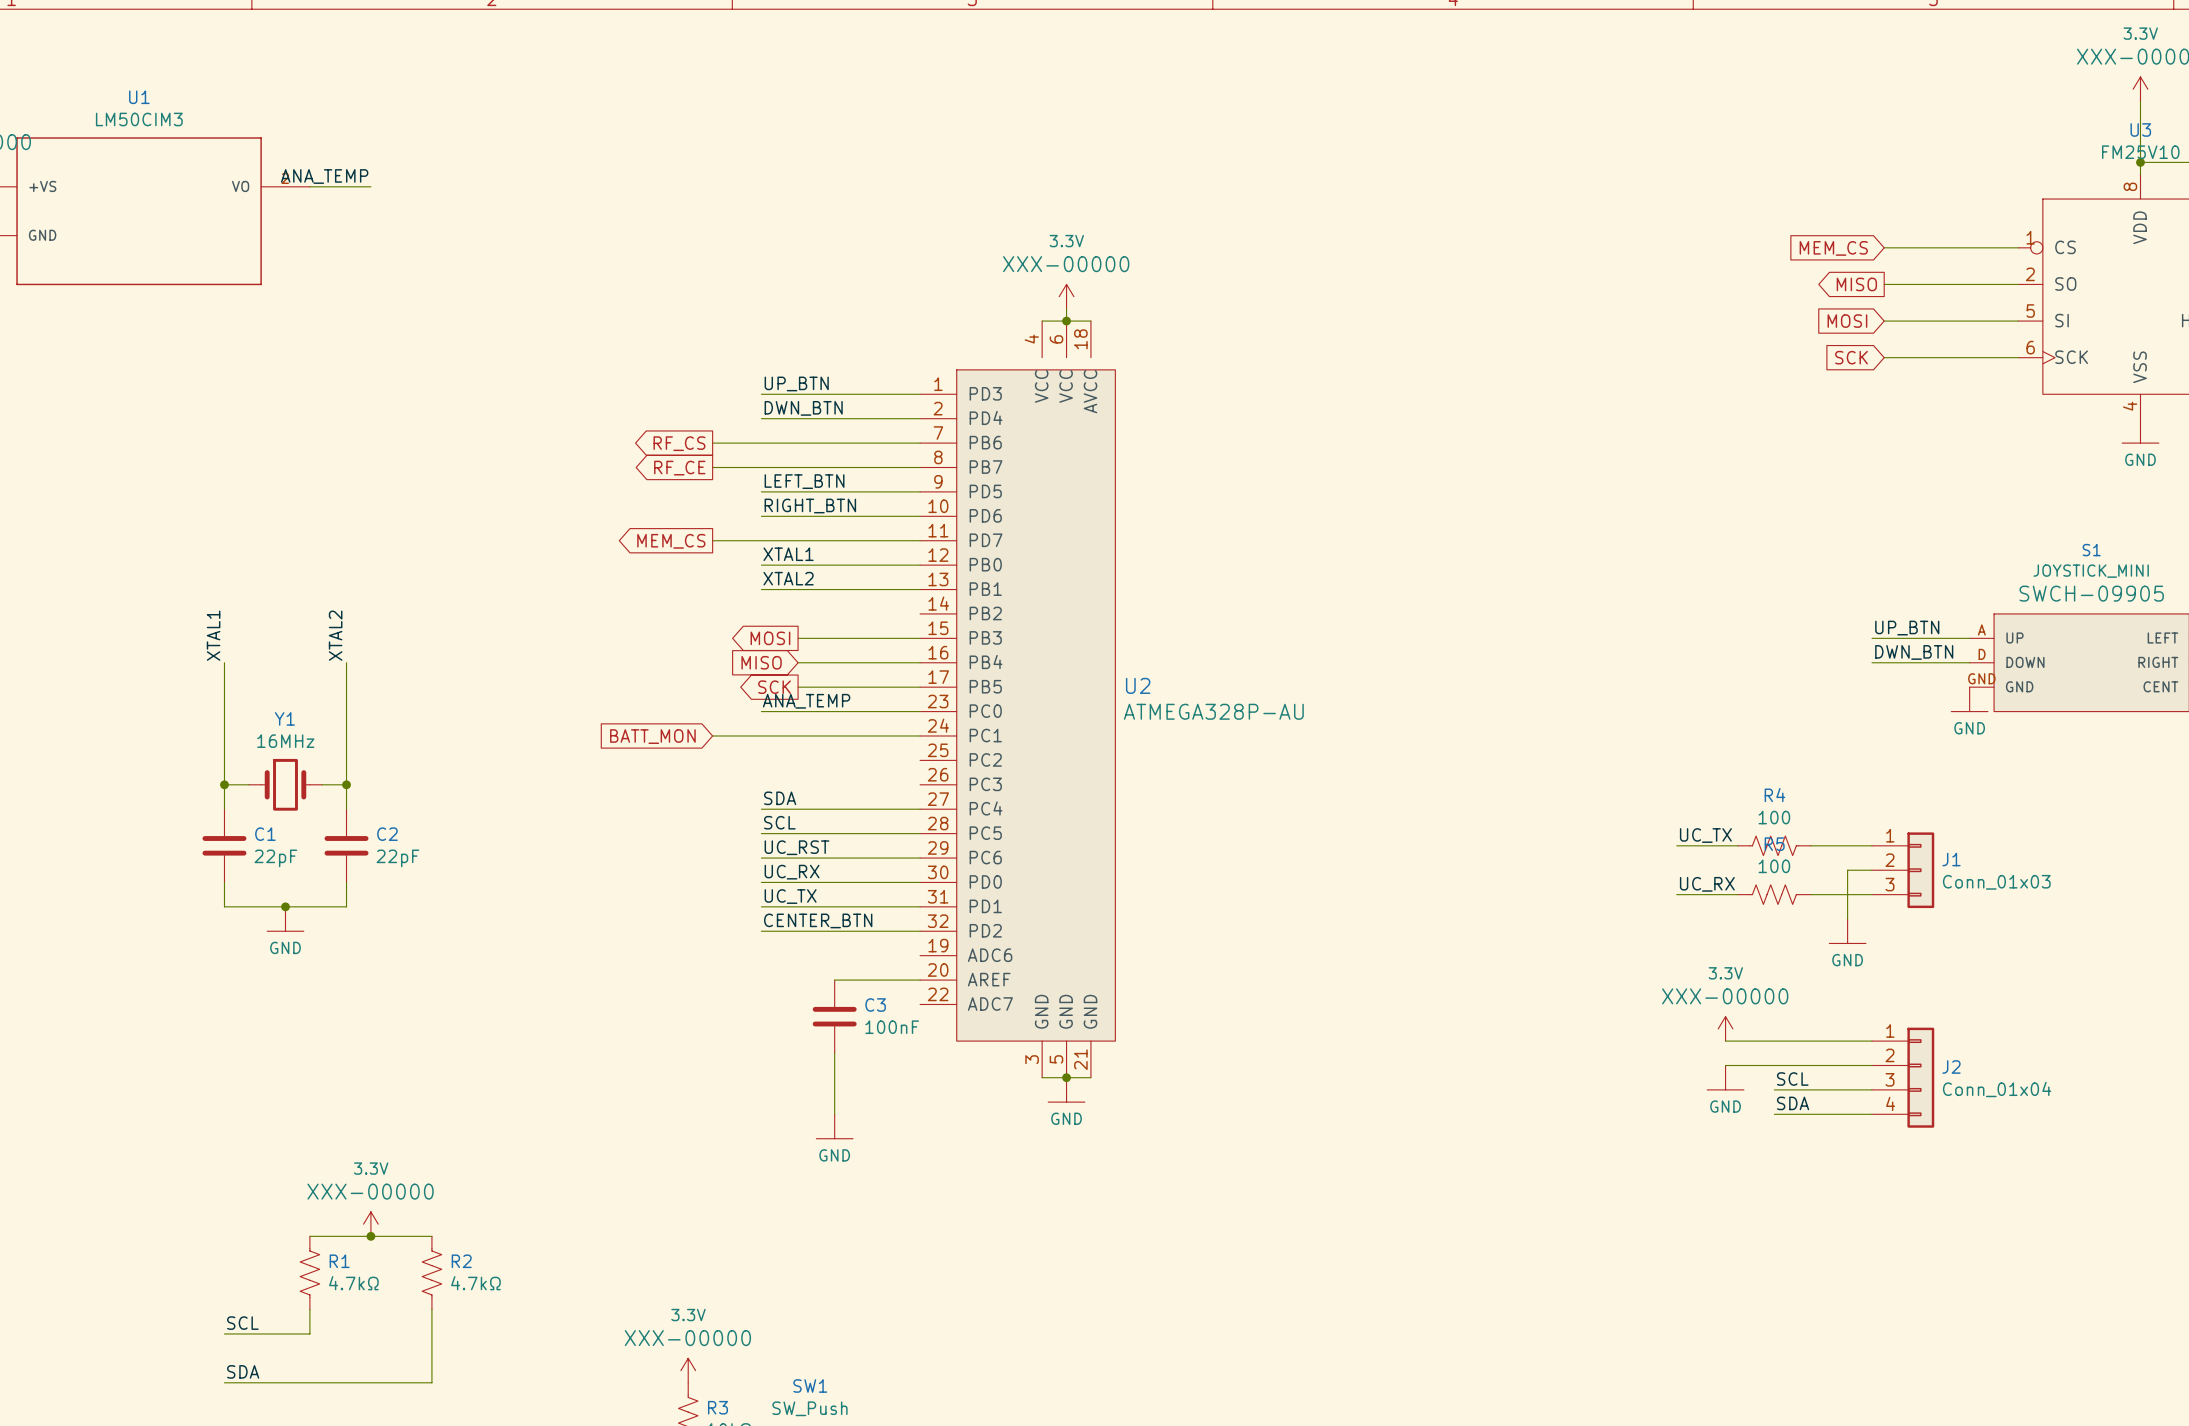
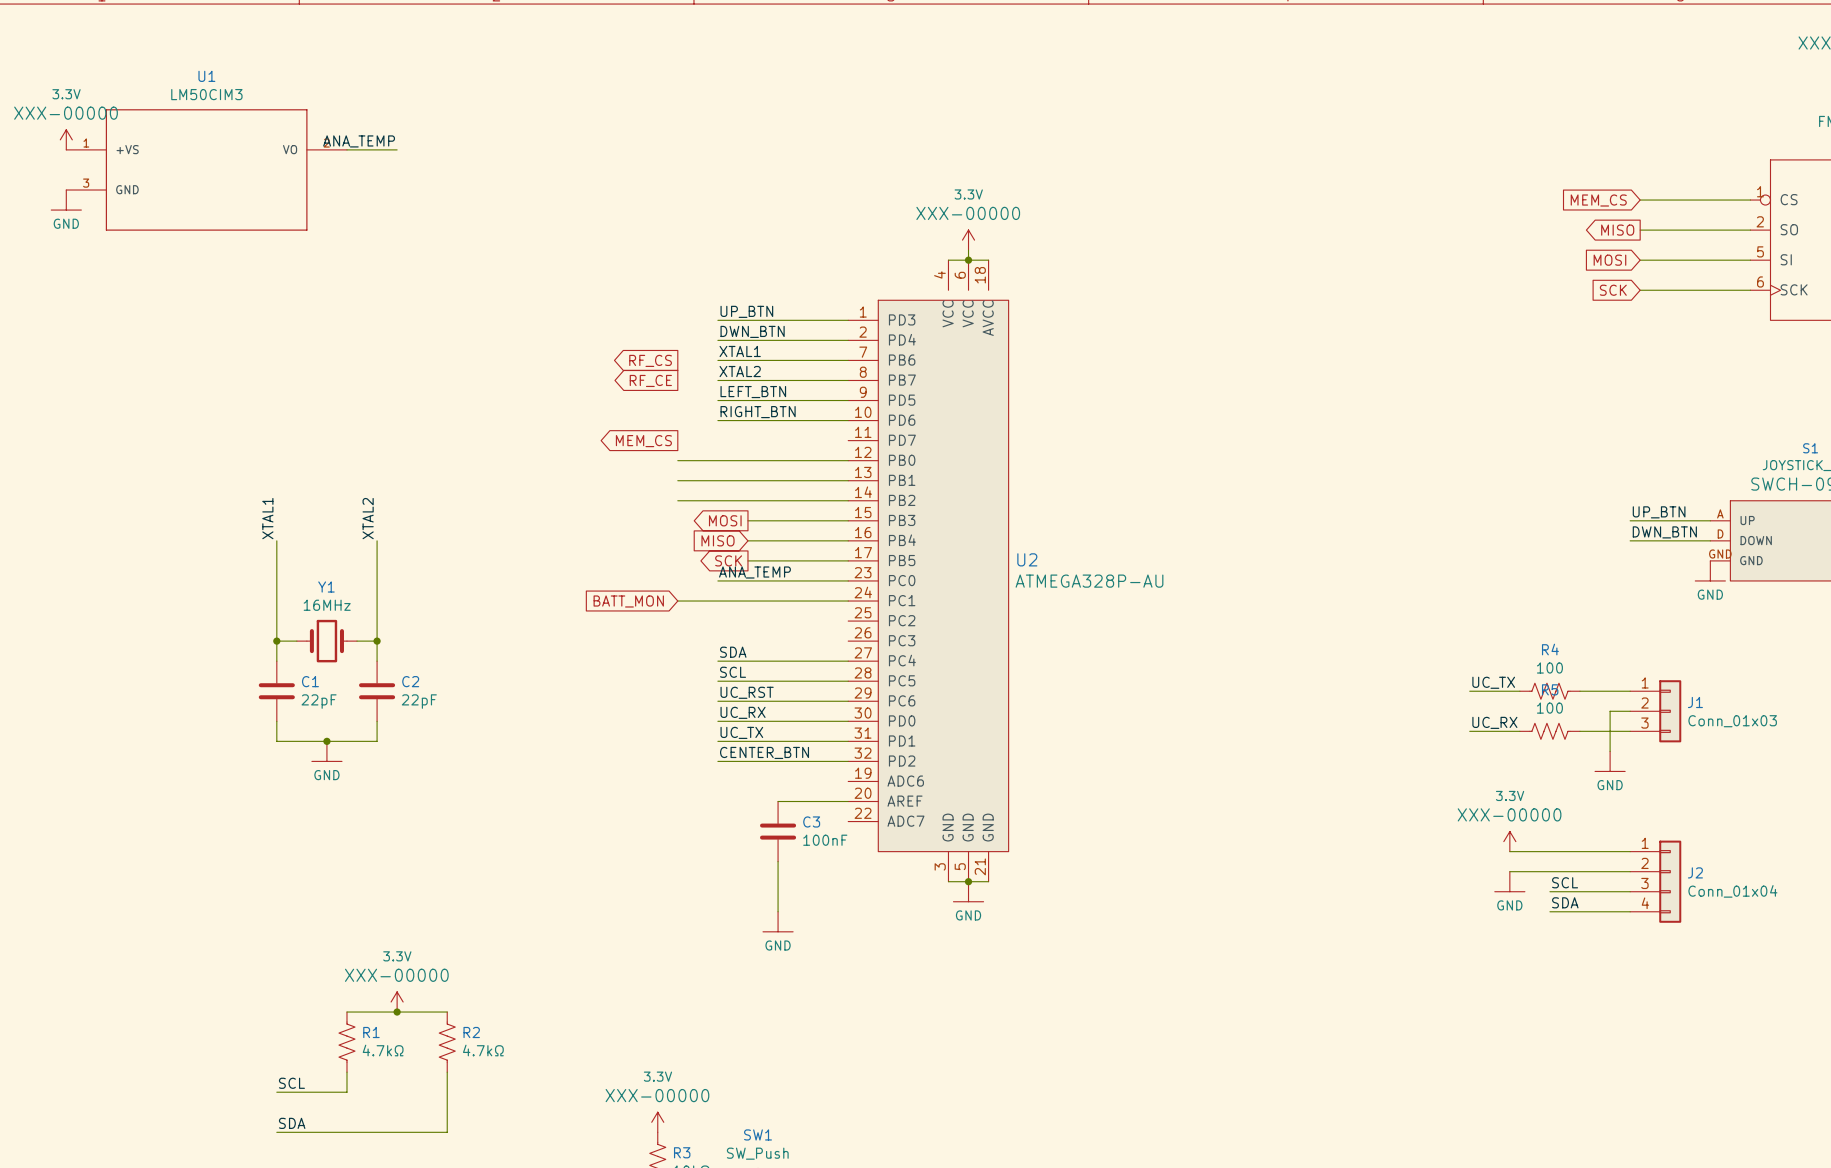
wire: (712, 443) (761, 443) -> (677, 460) (717, 460)
wire: (712, 467) (761, 467) -> (677, 480) (717, 480)
wire: (712, 540) (920, 540) -> (677, 500) (848, 500)
label position: XTAL1 (788, 554) -> XTAL1 (740, 351)
label position: XTAL2 (788, 578) -> XTAL2 (740, 371)

